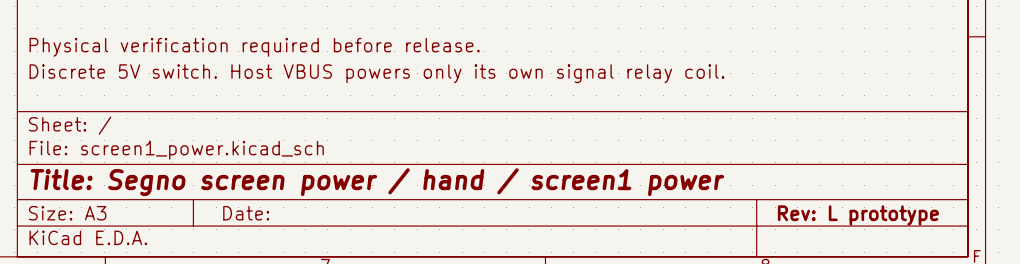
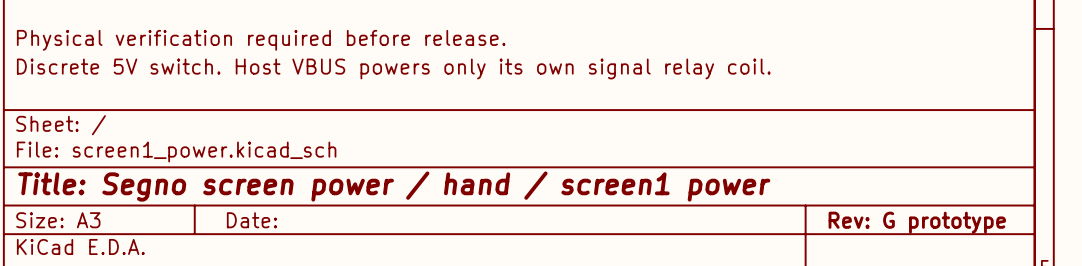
title block: Rev: L prototype (858, 215) -> Rev: G prototype (917, 222)

